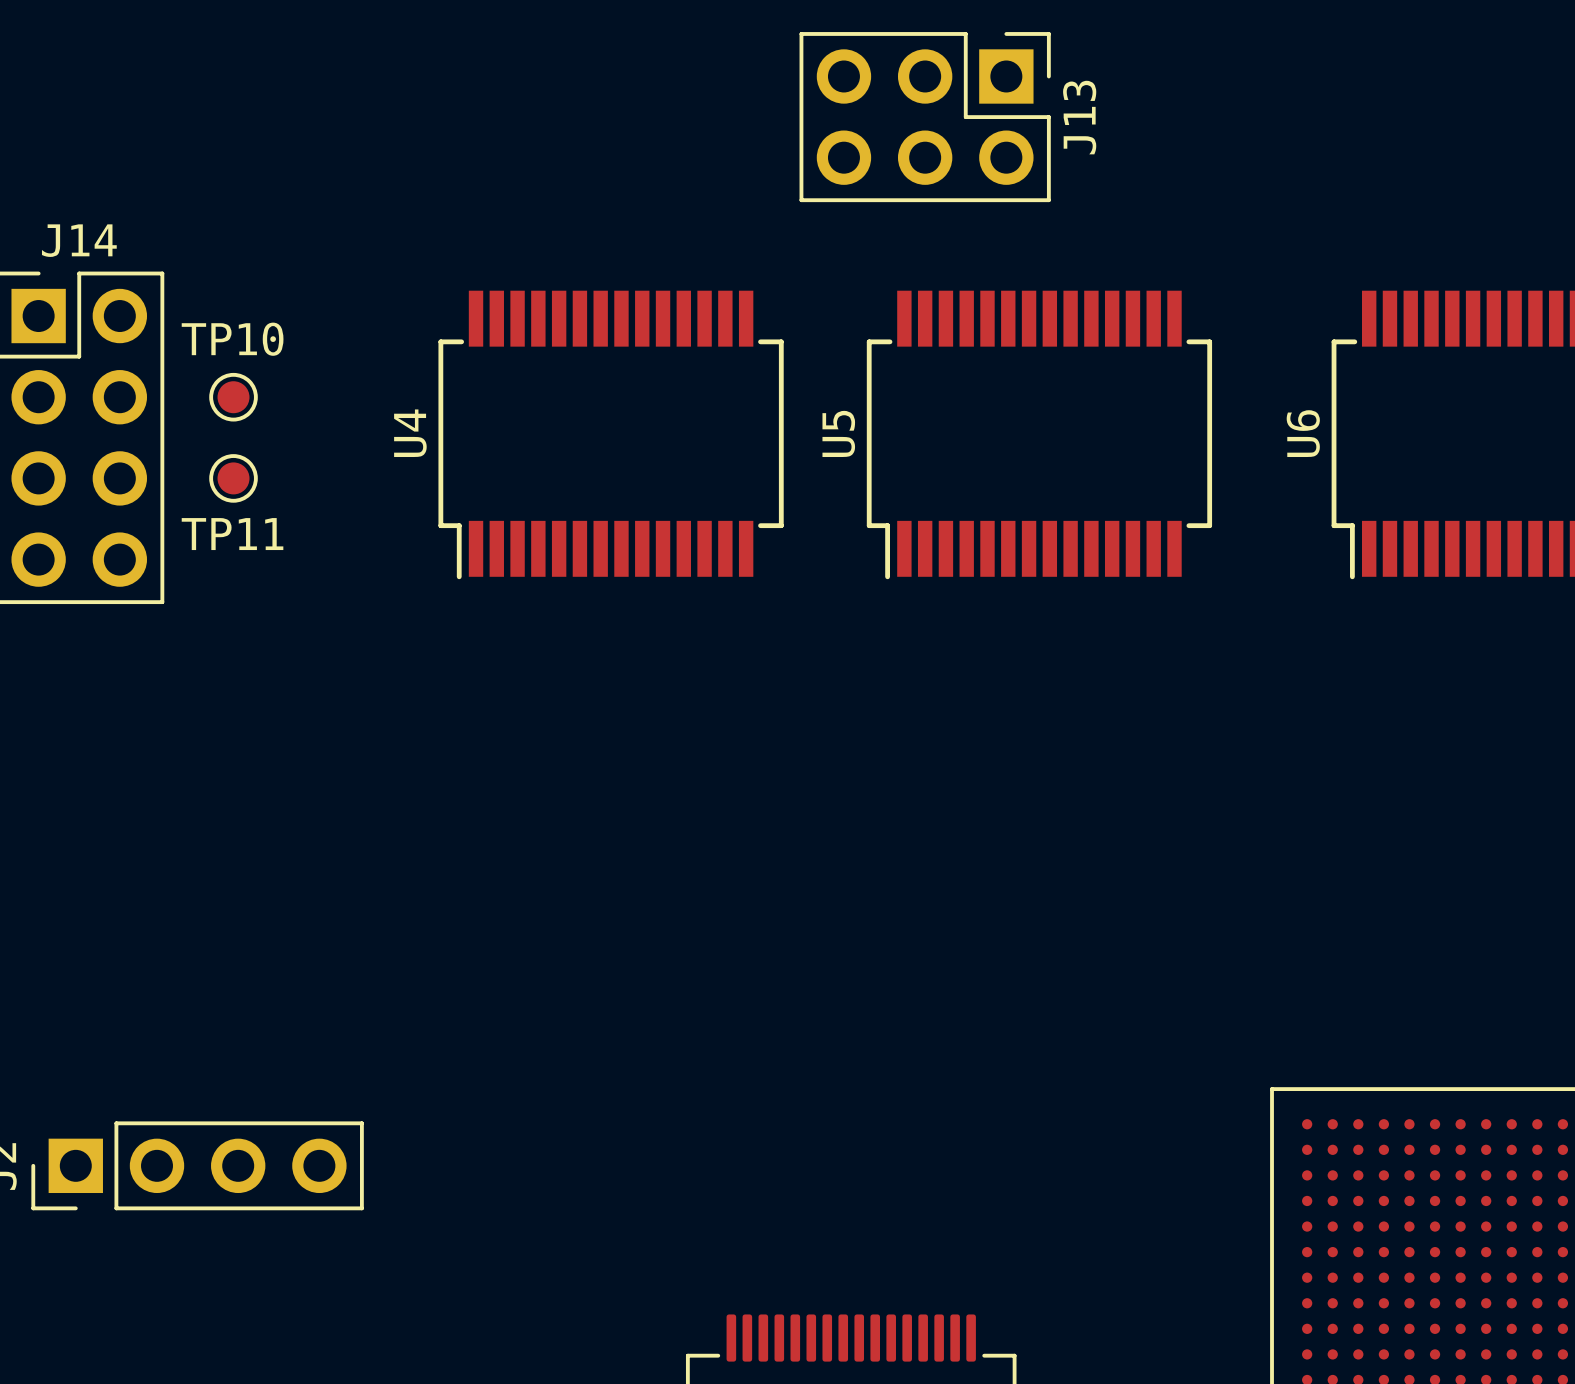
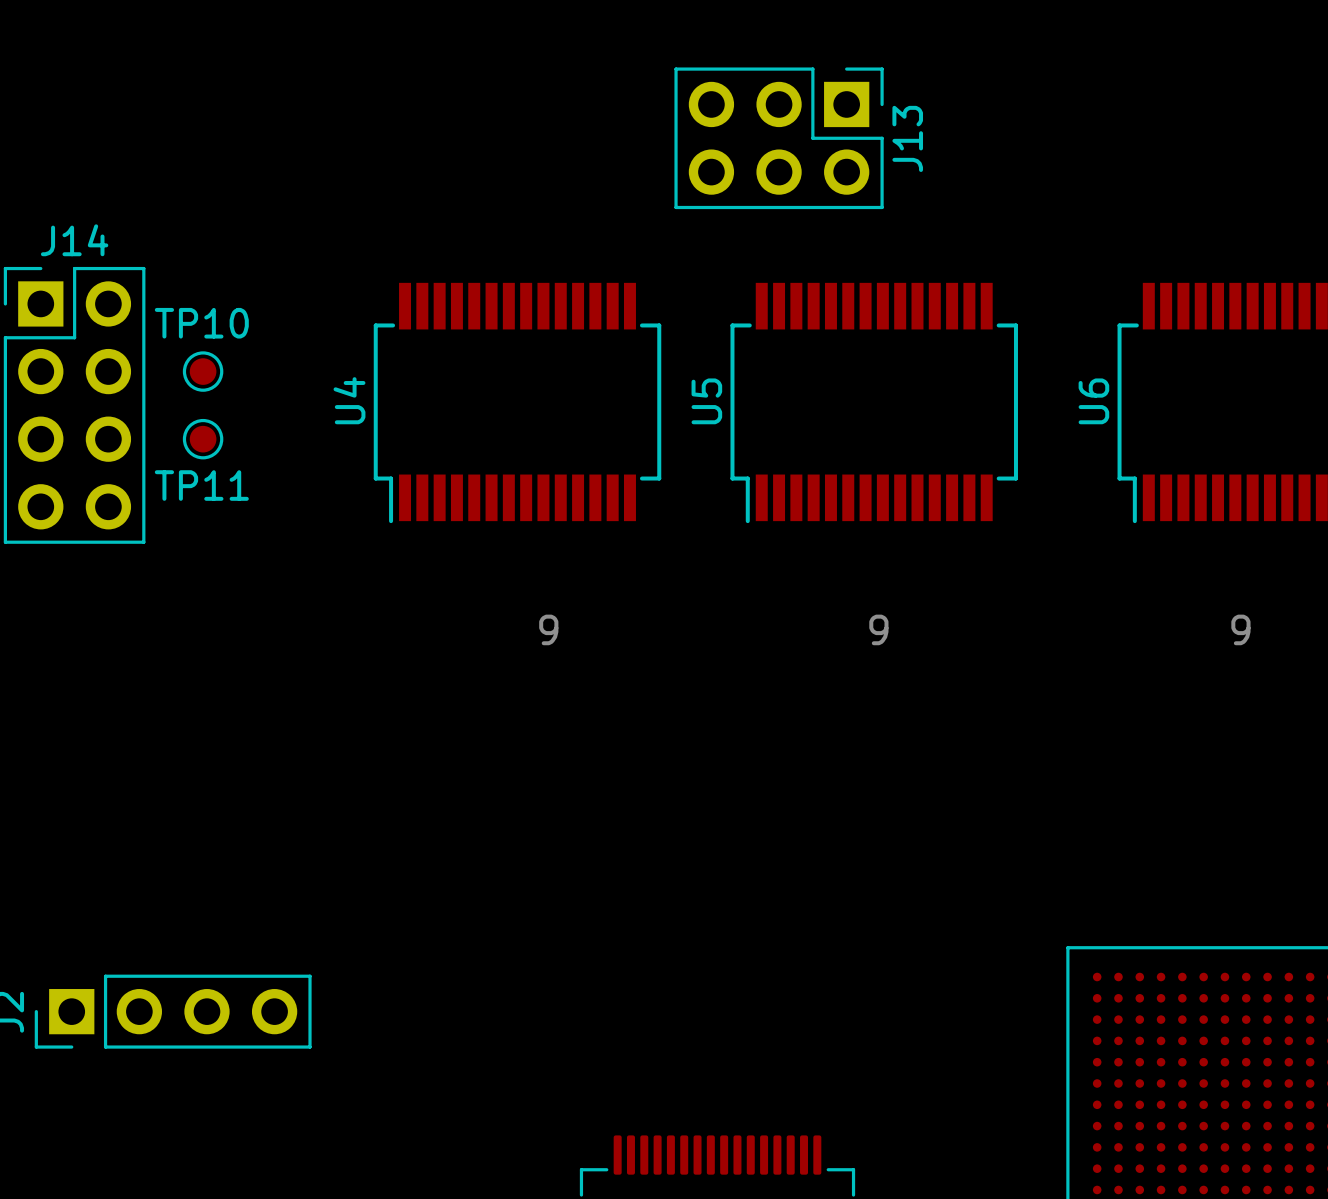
text: none -> 9 (548, 629)
text: none -> 9 (878, 629)
text: none -> 9 (1240, 629)

